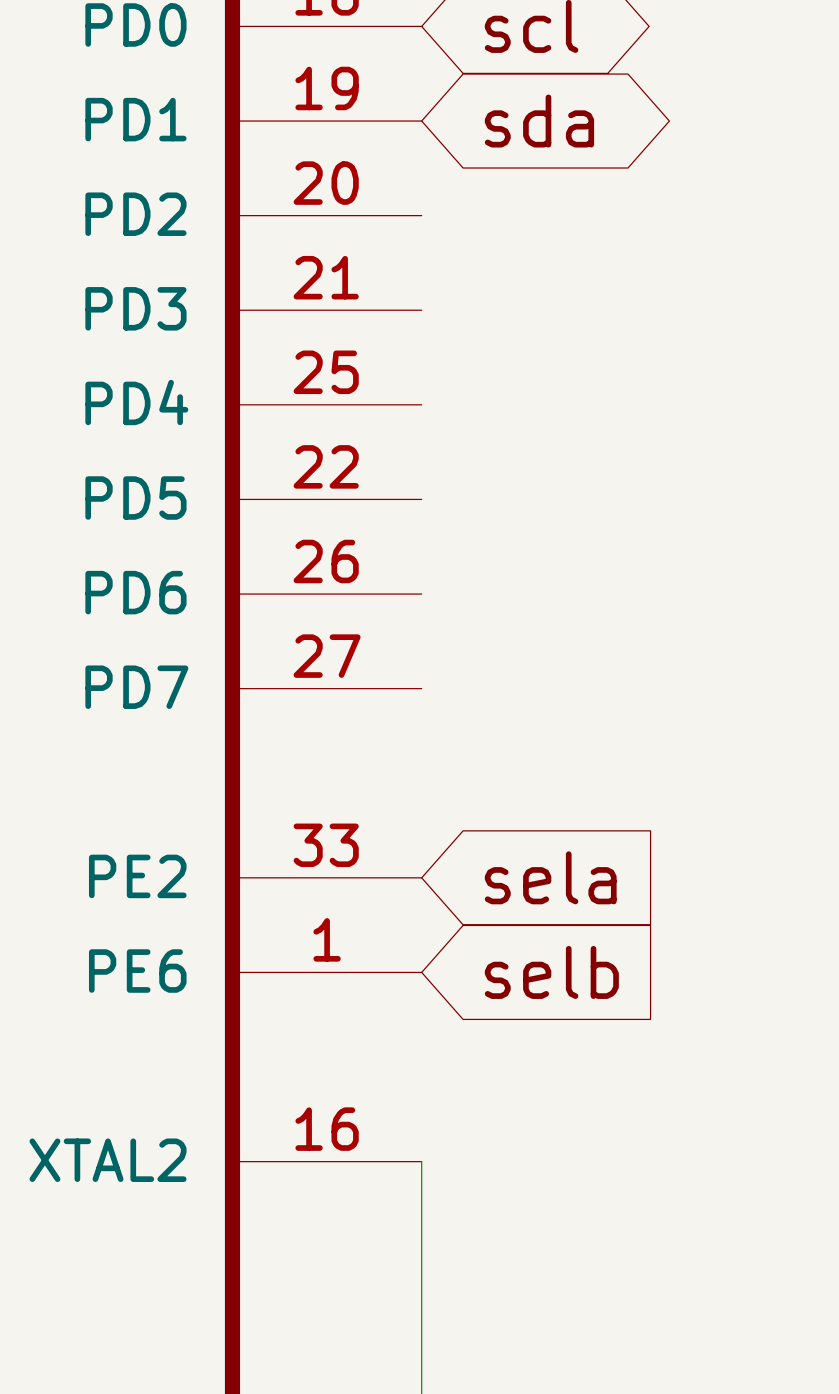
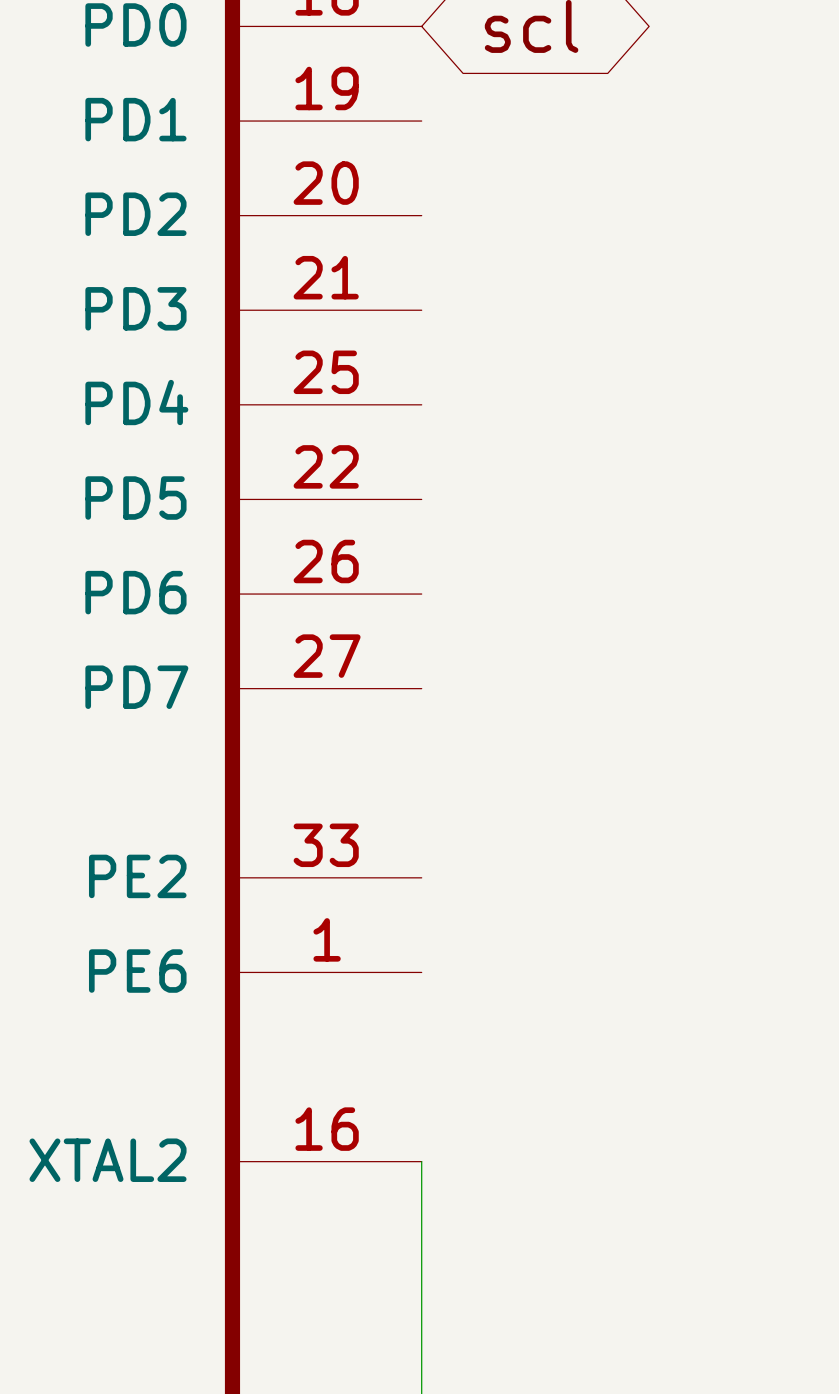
global label: sda (539, 121) -> none
global label: sela (550, 877) -> none
global label: selb (551, 972) -> none

